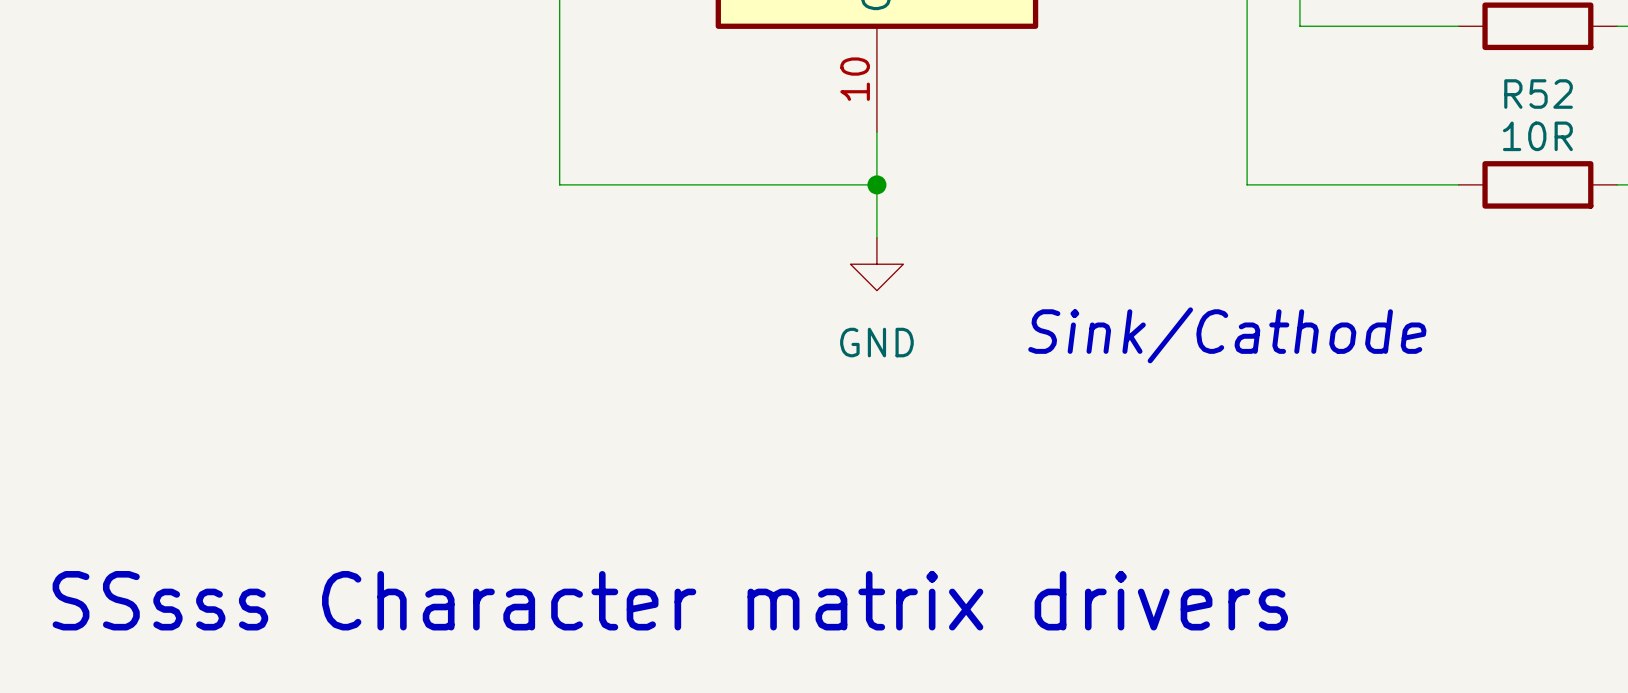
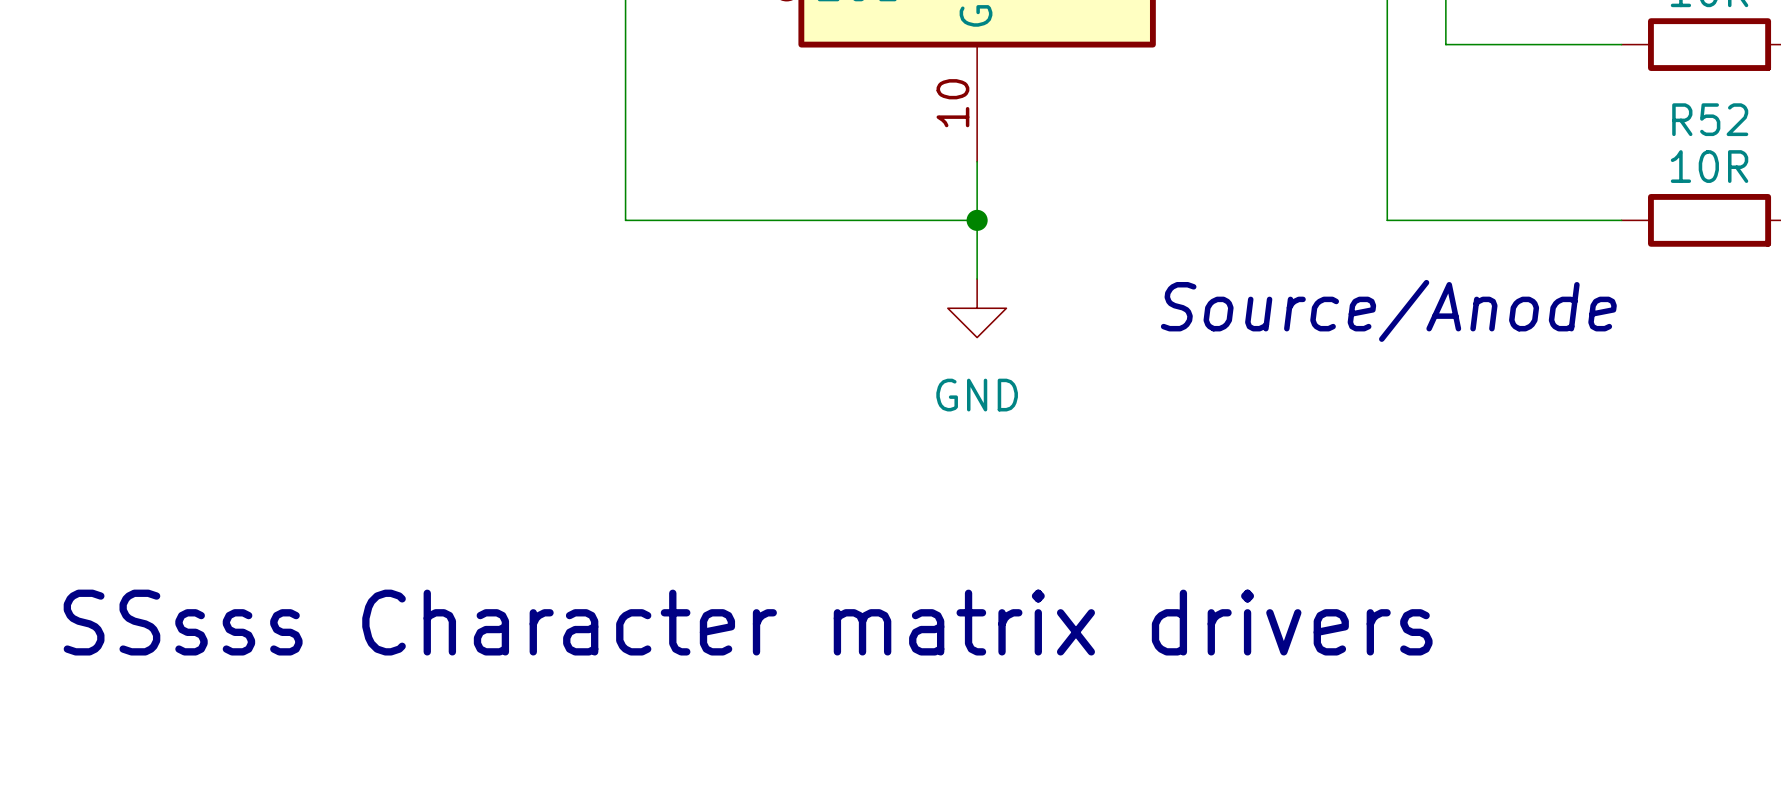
text: none -> Source/Anode (1388, 310)
text: Sink/Cathode (1227, 335) -> none
text position: SSsss Character matrix drivers (670, 600) -> SSsss Character matrix drivers (748, 622)

